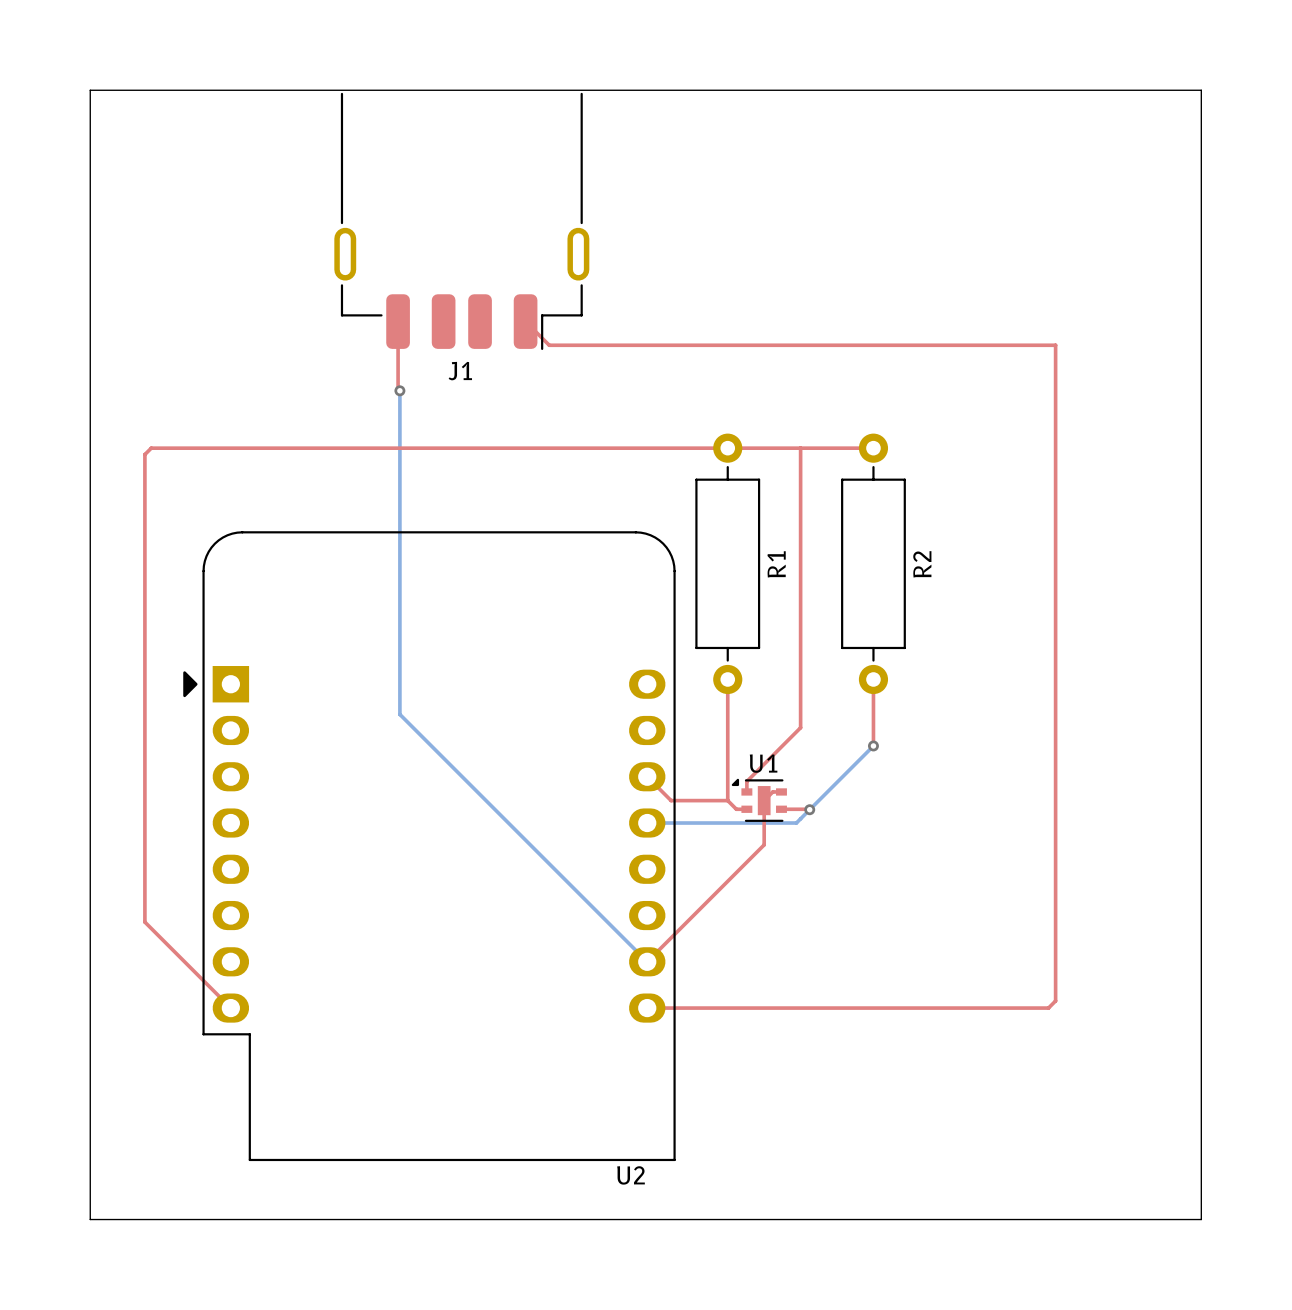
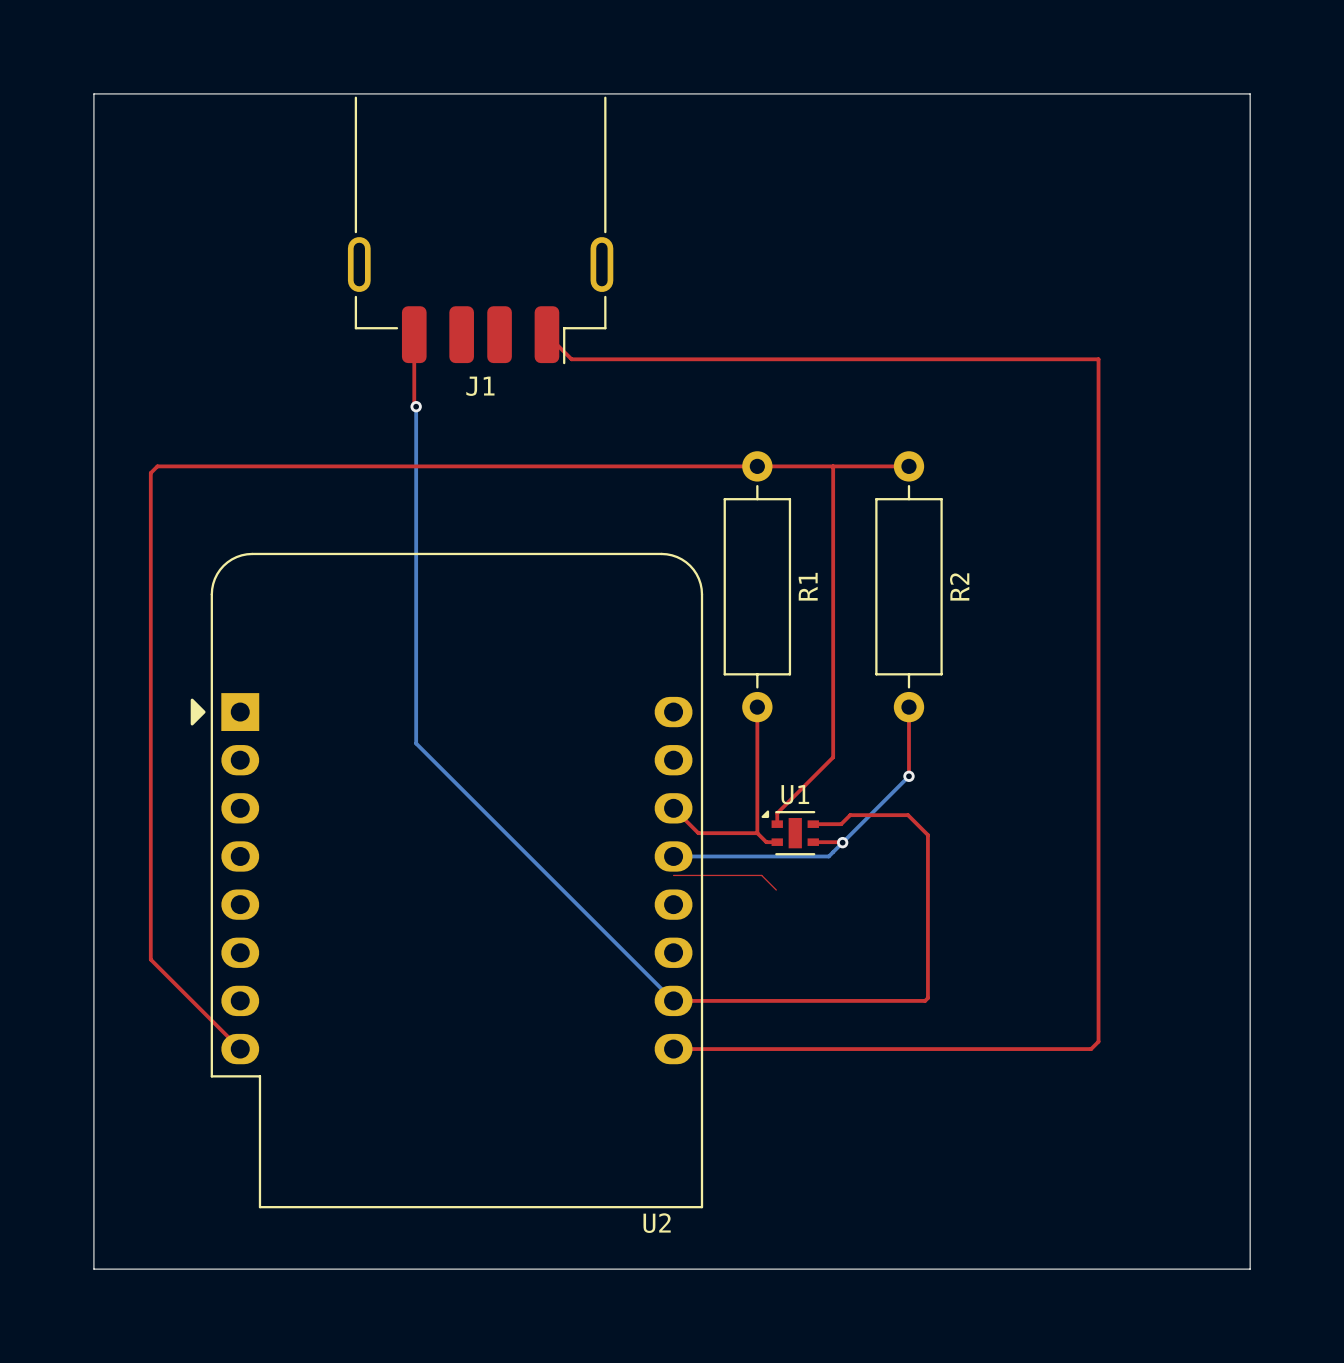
top track: (781, 791) (772, 791) (764, 800) (764, 844) (647, 961) -> (813, 824) (841, 824) (850, 815) (908, 815) (927, 835) (927, 998) (925, 1000) (673, 1000)
top track: none -> (673, 875) (761, 875) (776, 890)

